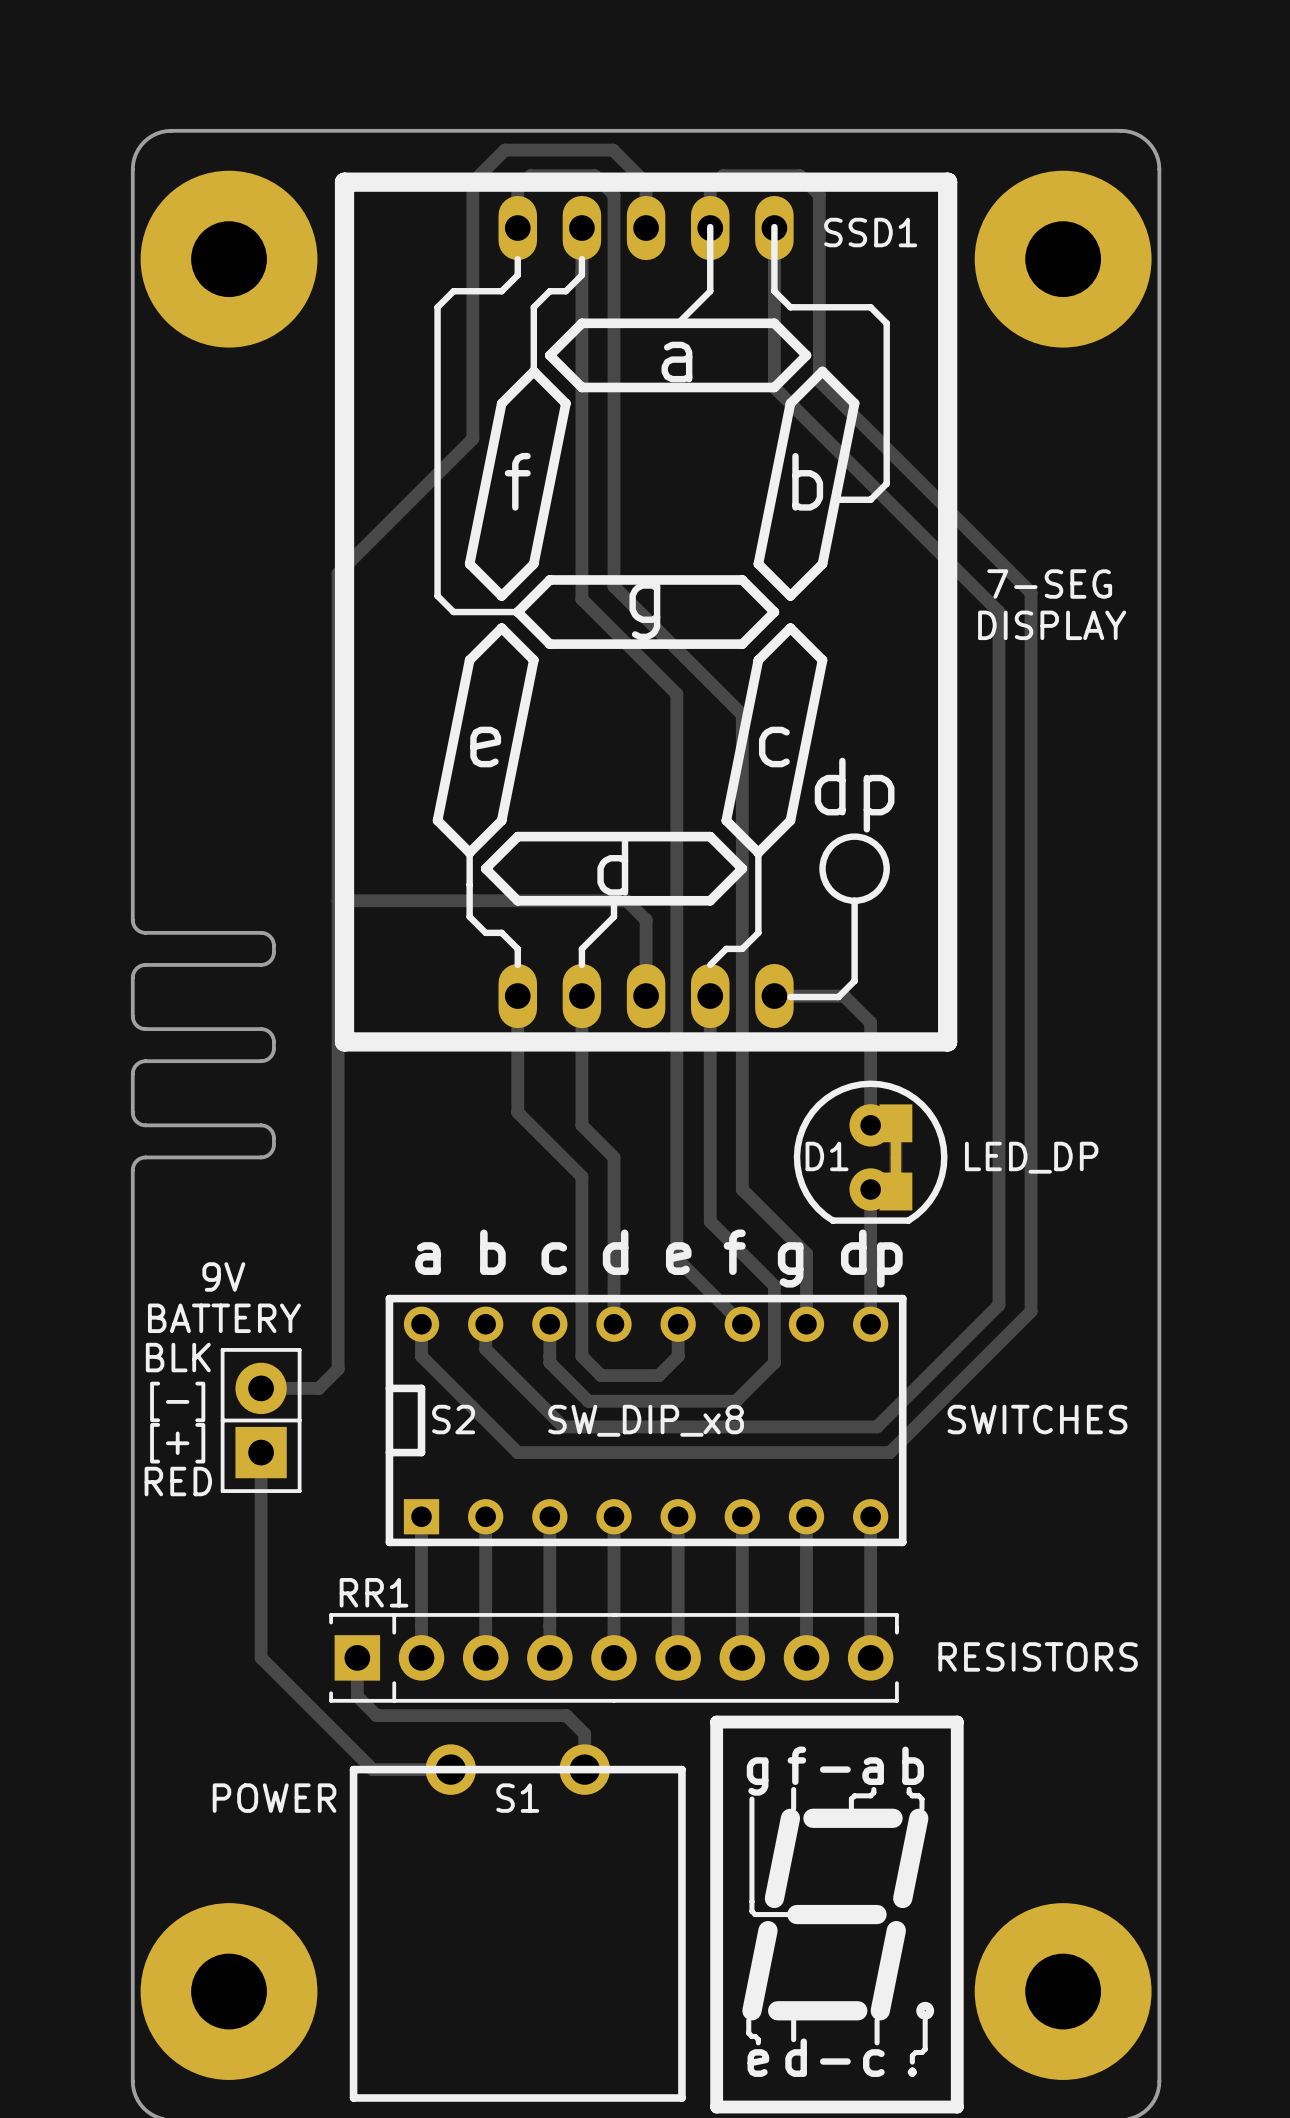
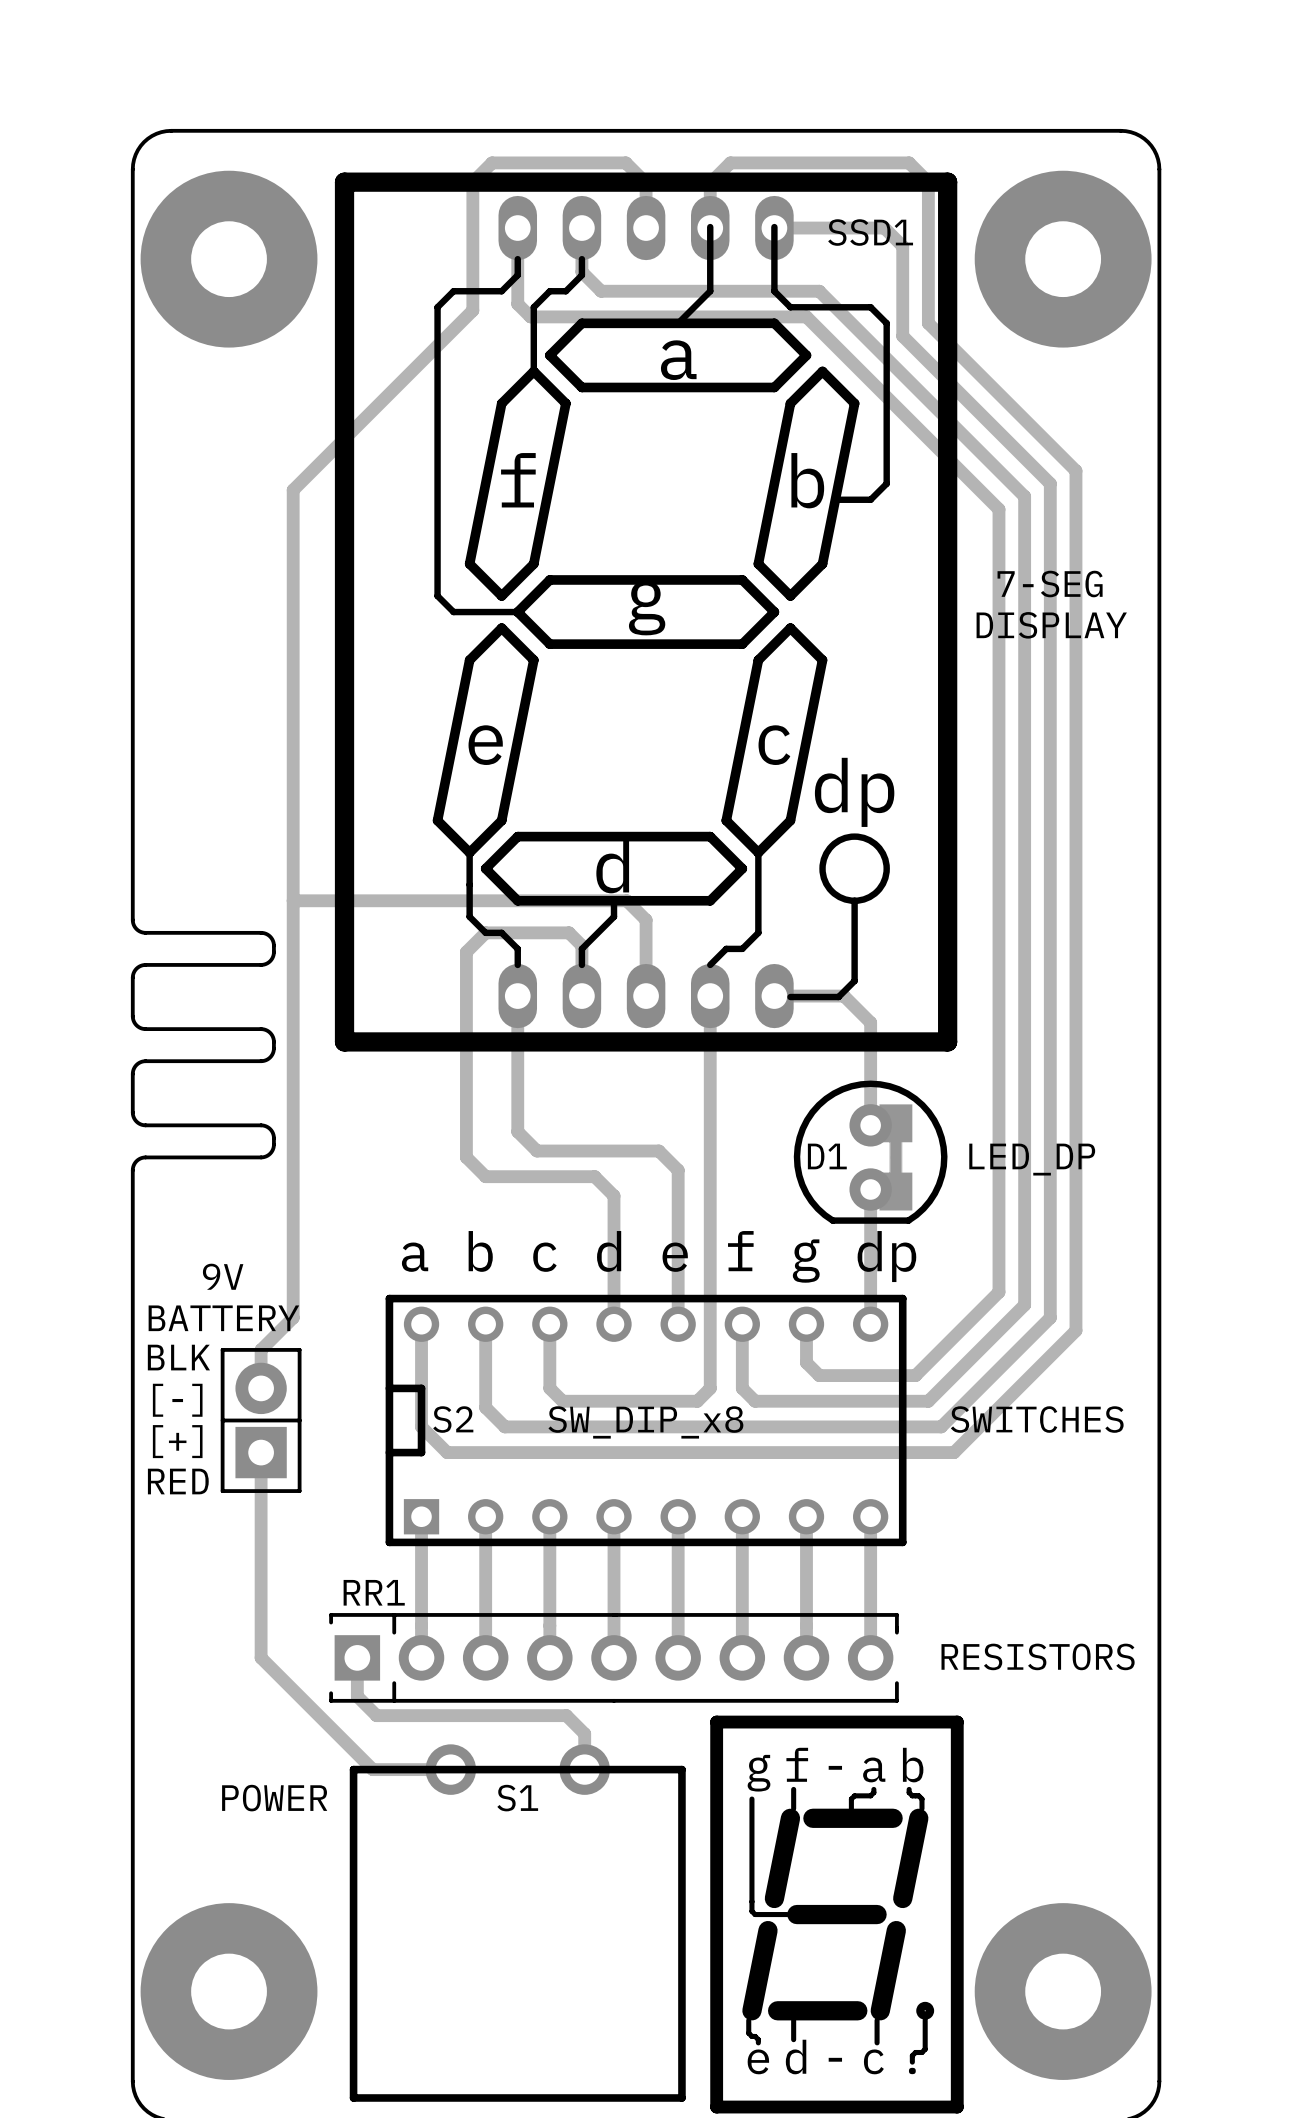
track: (492, 162) (504, 150) (613, 150) (625, 162) -> (492, 162) (625, 162)
track: (710, 188) (723, 175) (800, 175) (819, 194) (819, 381) (1031, 592) (1031, 1311) (889, 1452) -> (710, 188) (710, 183) (730, 162) (909, 162) (928, 182) (928, 323) (1075, 470) (1075, 1330) (954, 1452) (889, 1452)
track: (517, 228) (517, 188) (530, 175) (594, 175) (614, 194) (614, 586) (742, 714) (742, 1189) (806, 1253) (806, 1324) -> none
track: (774, 228) (774, 387) (998, 612) -> (517, 228) (517, 304) (530, 316) (806, 316) (998, 509) (998, 612)
track: none -> (774, 228) (884, 228) (902, 246) (902, 336) (1050, 483) (1050, 1317) (941, 1426) (877, 1426)
track: (581, 271) (581, 599) (676, 694) (676, 1258) (742, 1324) -> (581, 271) (601, 291) (819, 291) (1024, 496) (1024, 1305) (928, 1401) (755, 1401) (742, 1388) (742, 1324)
track: (472, 310) (472, 438) (338, 573) (338, 1369) (318, 1388) (261, 1388) -> (472, 310) (293, 490) (293, 1317) (261, 1349) (261, 1388)
track: none -> (293, 900) (338, 900)
track: (581, 996) (581, 1125) (614, 1157) (614, 1195) -> (581, 996) (581, 945) (569, 932) (485, 932) (466, 952) (466, 1157) (485, 1176) (594, 1176) (614, 1195)
track: (517, 1112) (581, 1176) (581, 1356) (601, 1375) (658, 1375) (678, 1356) (678, 1324) -> (517, 1112) (517, 1131) (537, 1151) (658, 1151) (678, 1170) (678, 1324)
track: (710, 1221) (774, 1285) (774, 1362) (735, 1401) (697, 1401) -> (710, 1221) (710, 1388) (697, 1401)
track: (998, 1292) (998, 1305) (877, 1426) -> (998, 1292) (915, 1375) (819, 1375) (806, 1362) (806, 1324)
track: (485, 1349) (563, 1426) -> (485, 1349) (485, 1407) (504, 1426) (563, 1426)
track: (421, 1356) (517, 1452) -> (421, 1356) (421, 1426) (447, 1452) (517, 1452)
track: (549, 1362) (588, 1401) -> (549, 1362) (549, 1388) (562, 1401) (588, 1401)

